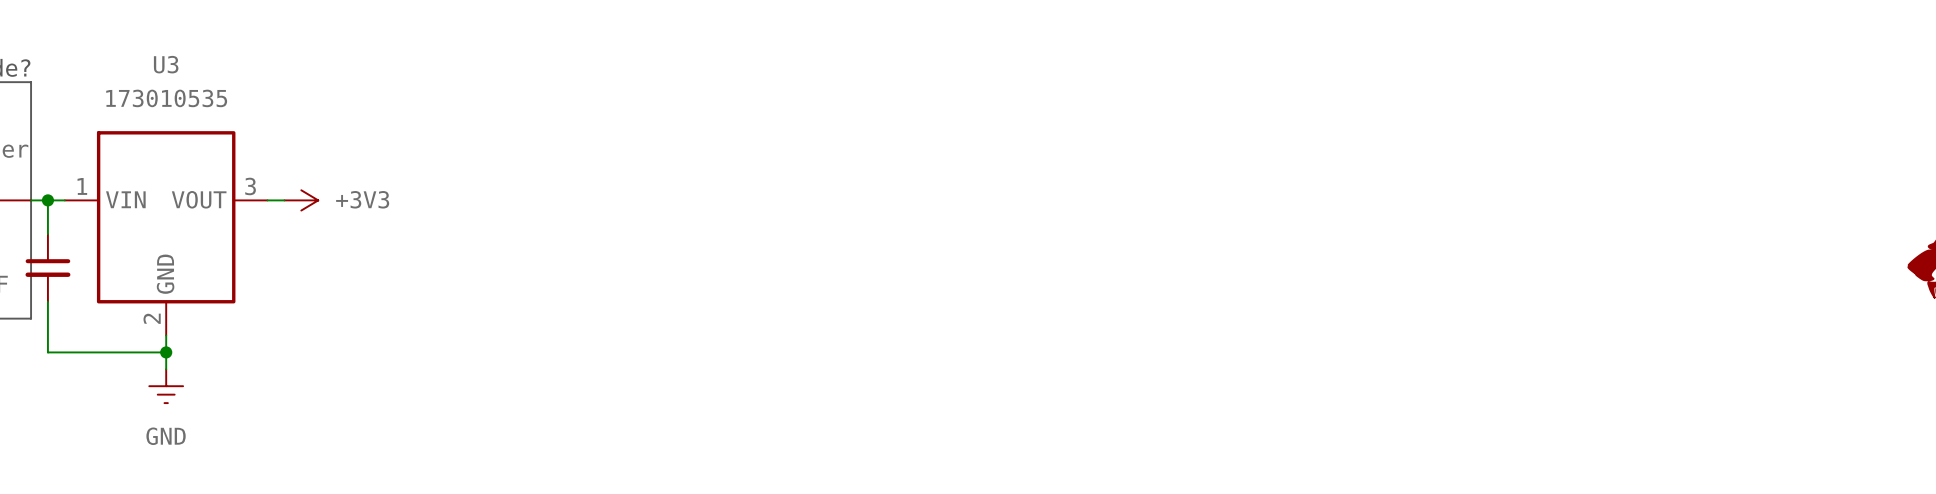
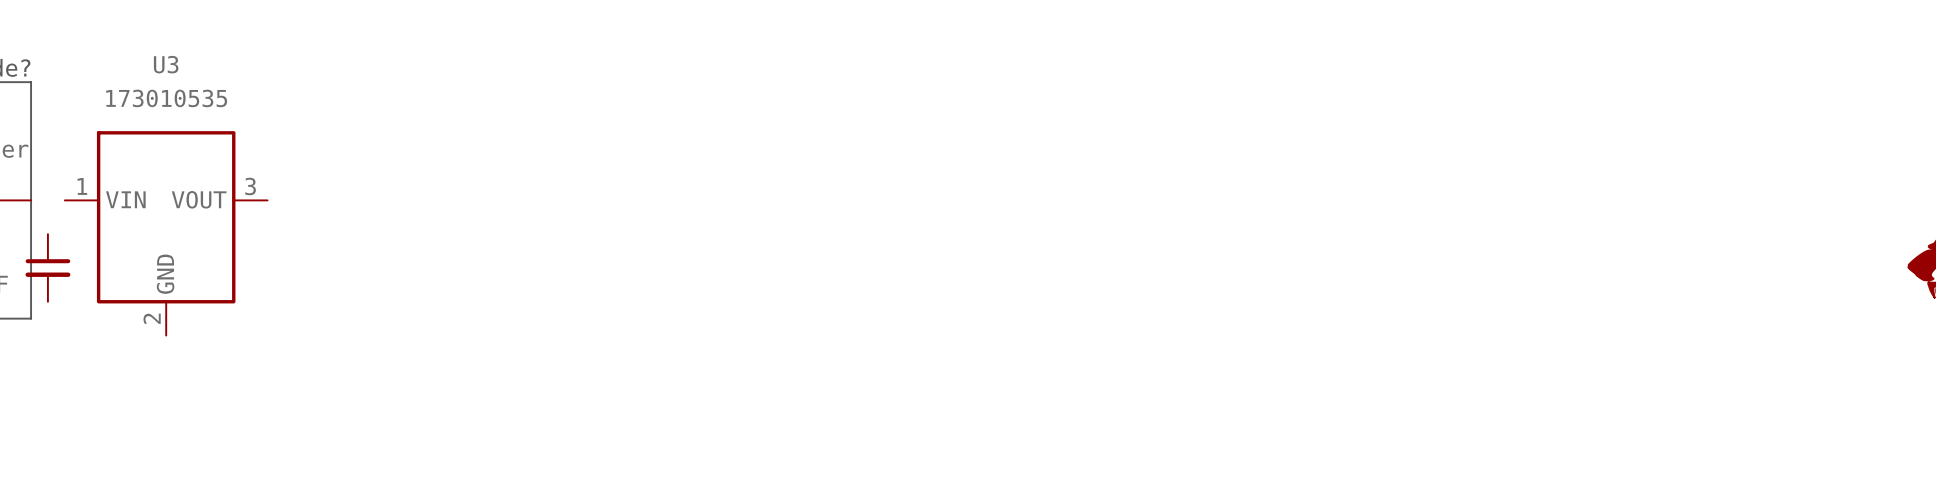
wire: (31, 200) (64, 200) -> none
wire: (47, 200) (47, 234) -> none
junction: (47, 200) -> none
wire: (267, 200) (284, 200) -> none
power symbol: +3V3 (301, 200) -> none
wire: (47, 301) (47, 352) (166, 352) -> none
wire: (166, 335) (166, 369) -> none
junction: (166, 352) -> none
power symbol: GND (166, 386) -> none

